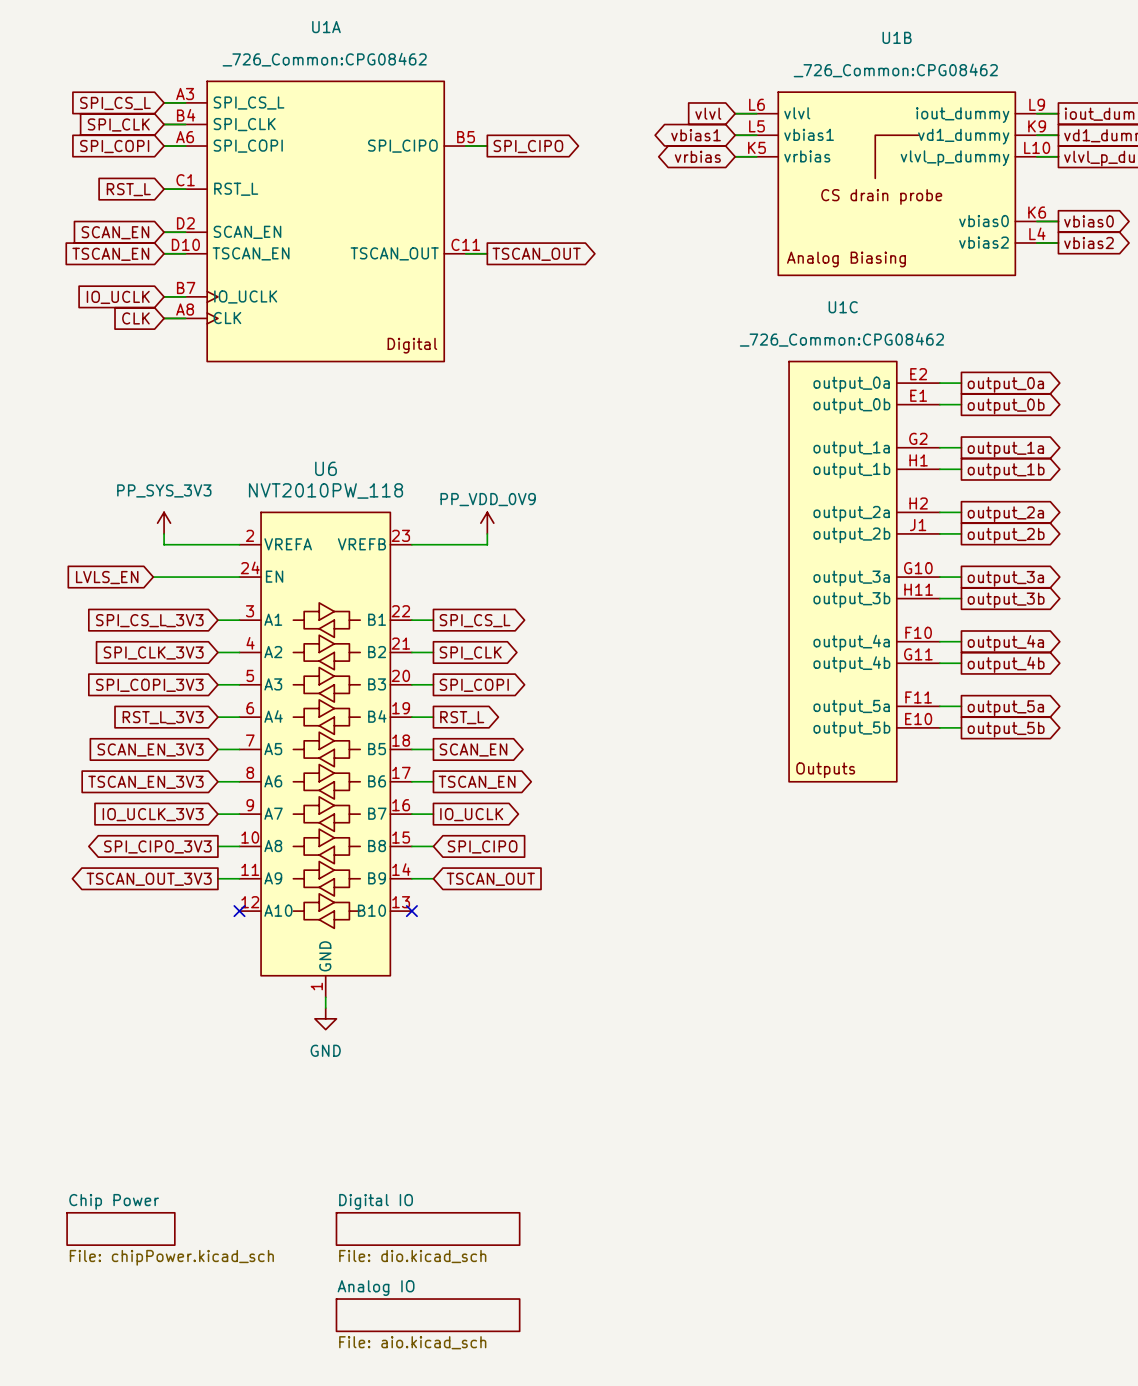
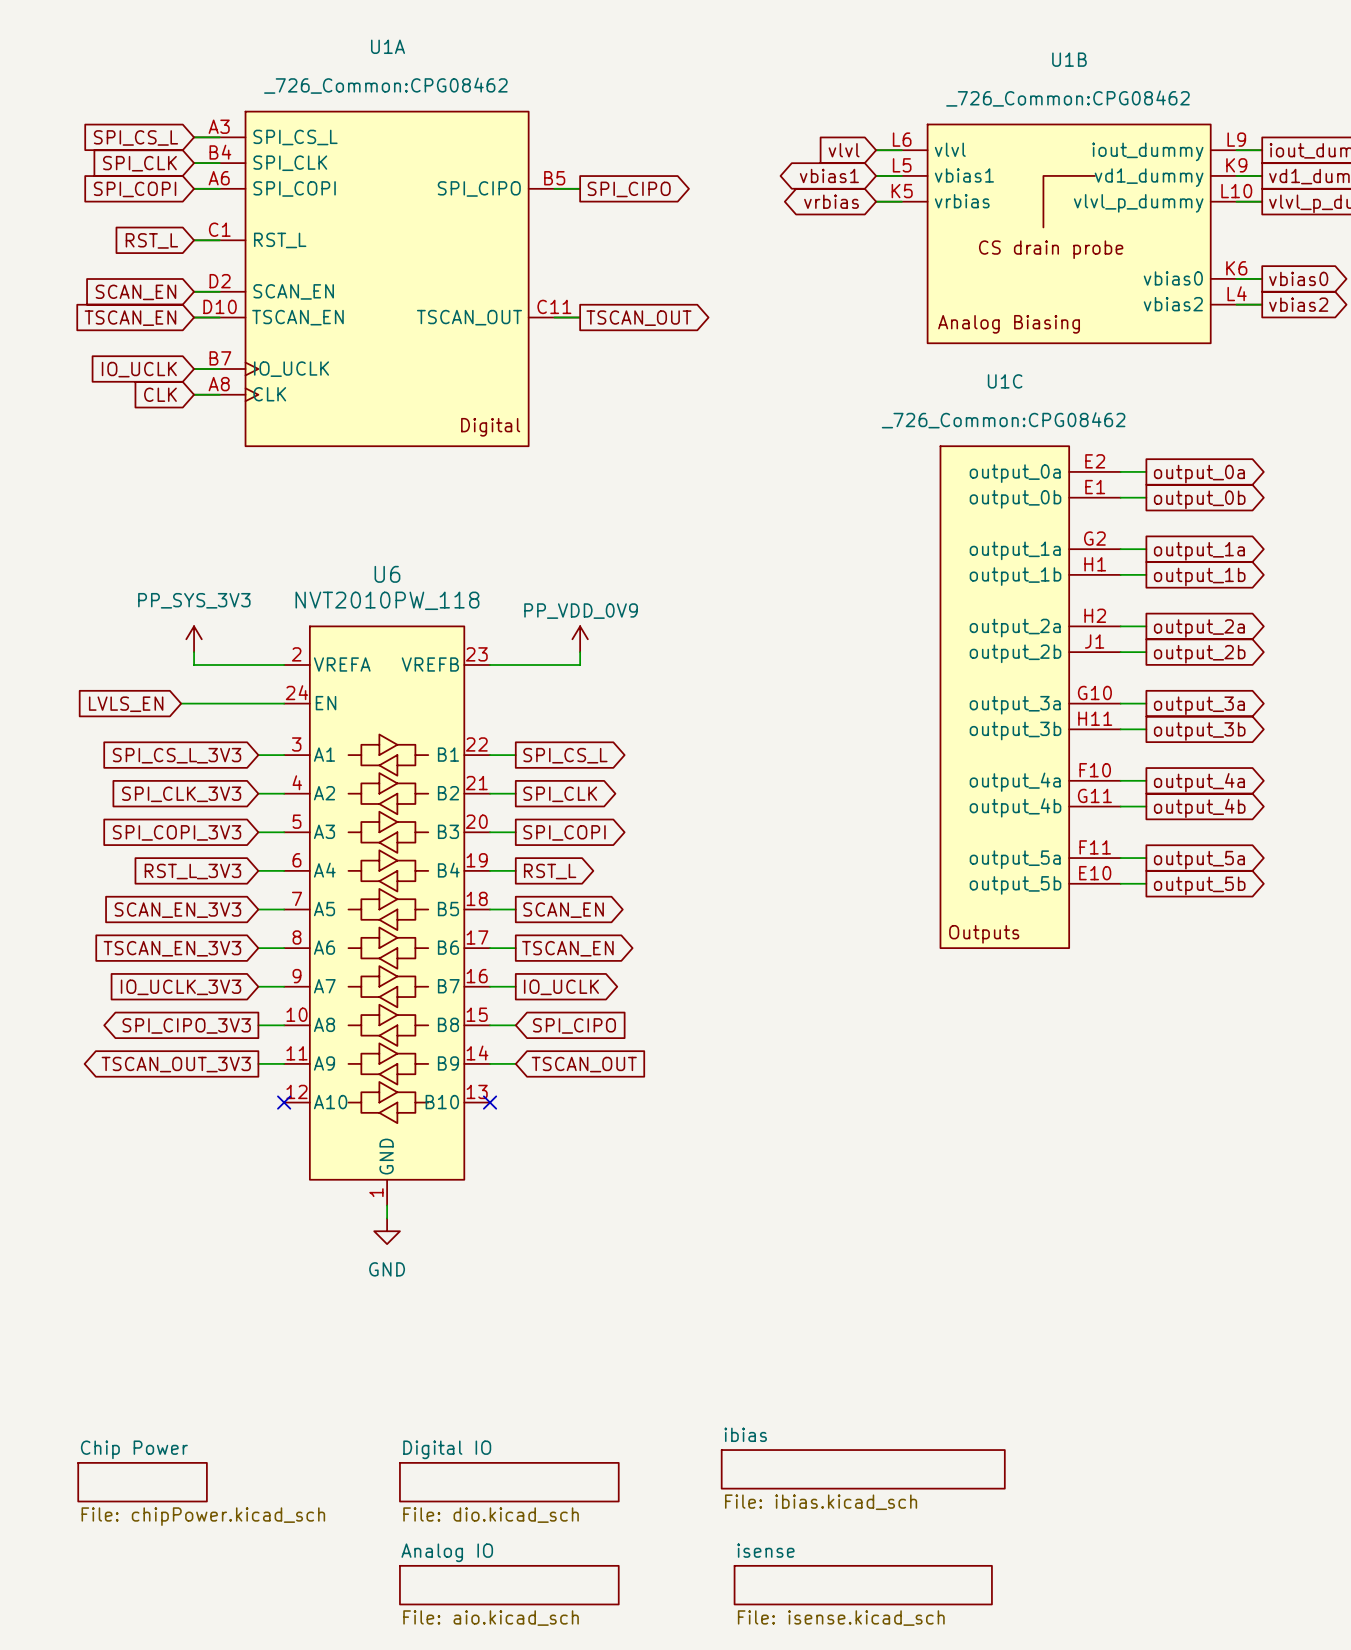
sheet ibias: none -> File: ibias.kicad_sch (863, 1469)
sheet isense: none -> File: isense.kicad_sch (863, 1585)

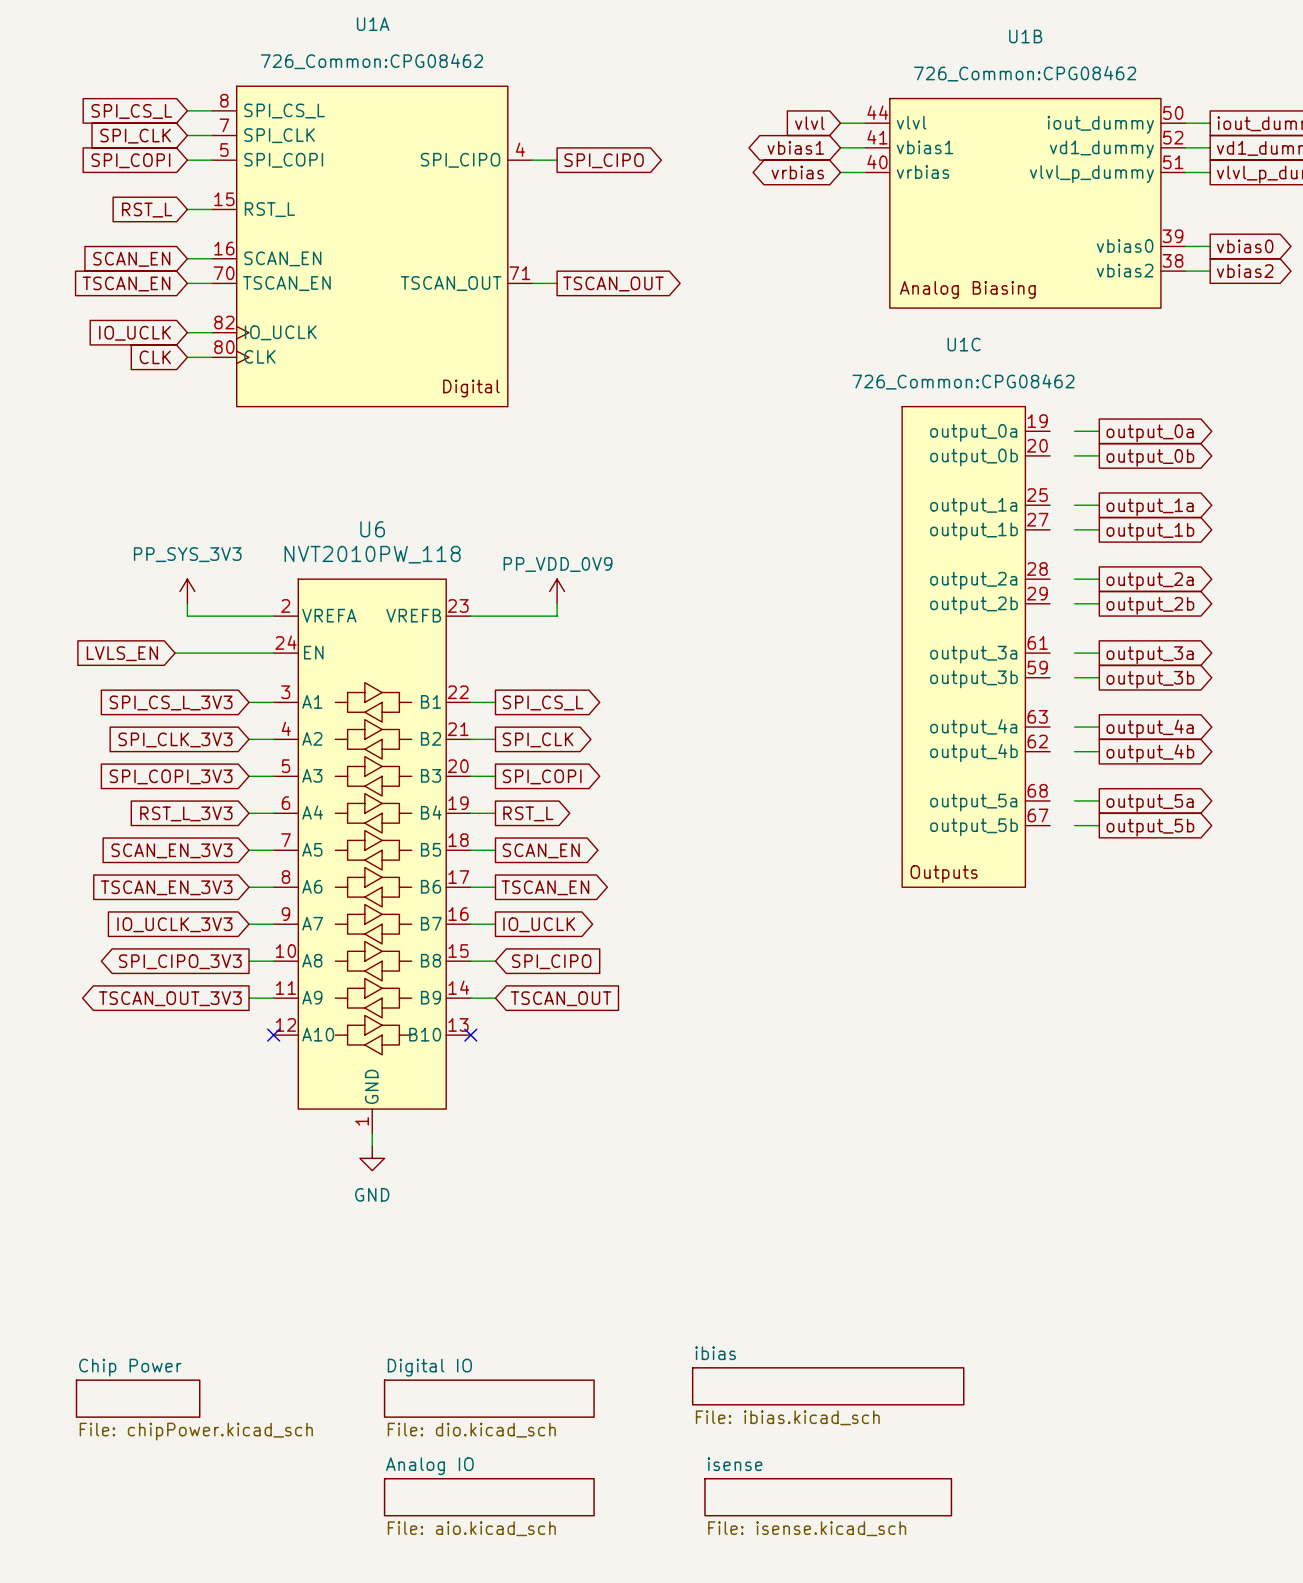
U1A text: _726_Common:CPG08462 (385, 85) -> 726_Common:CPG08462 (371, 61)
U1B text: _726_Common:CPG08462 (1067, 98) -> 726_Common:CPG08462 (1025, 73)
U1A symbol: [194, 111, 581, 447] -> [212, 86, 533, 407]
U1B symbol: [876, 124, 1263, 344] -> [865, 98, 1186, 309]
U1C text: _726_Common:CPG08462 (1003, 420) -> 726_Common:CPG08462 (963, 381)
U1C symbol: [940, 446, 1121, 949] -> [902, 406, 1051, 888]

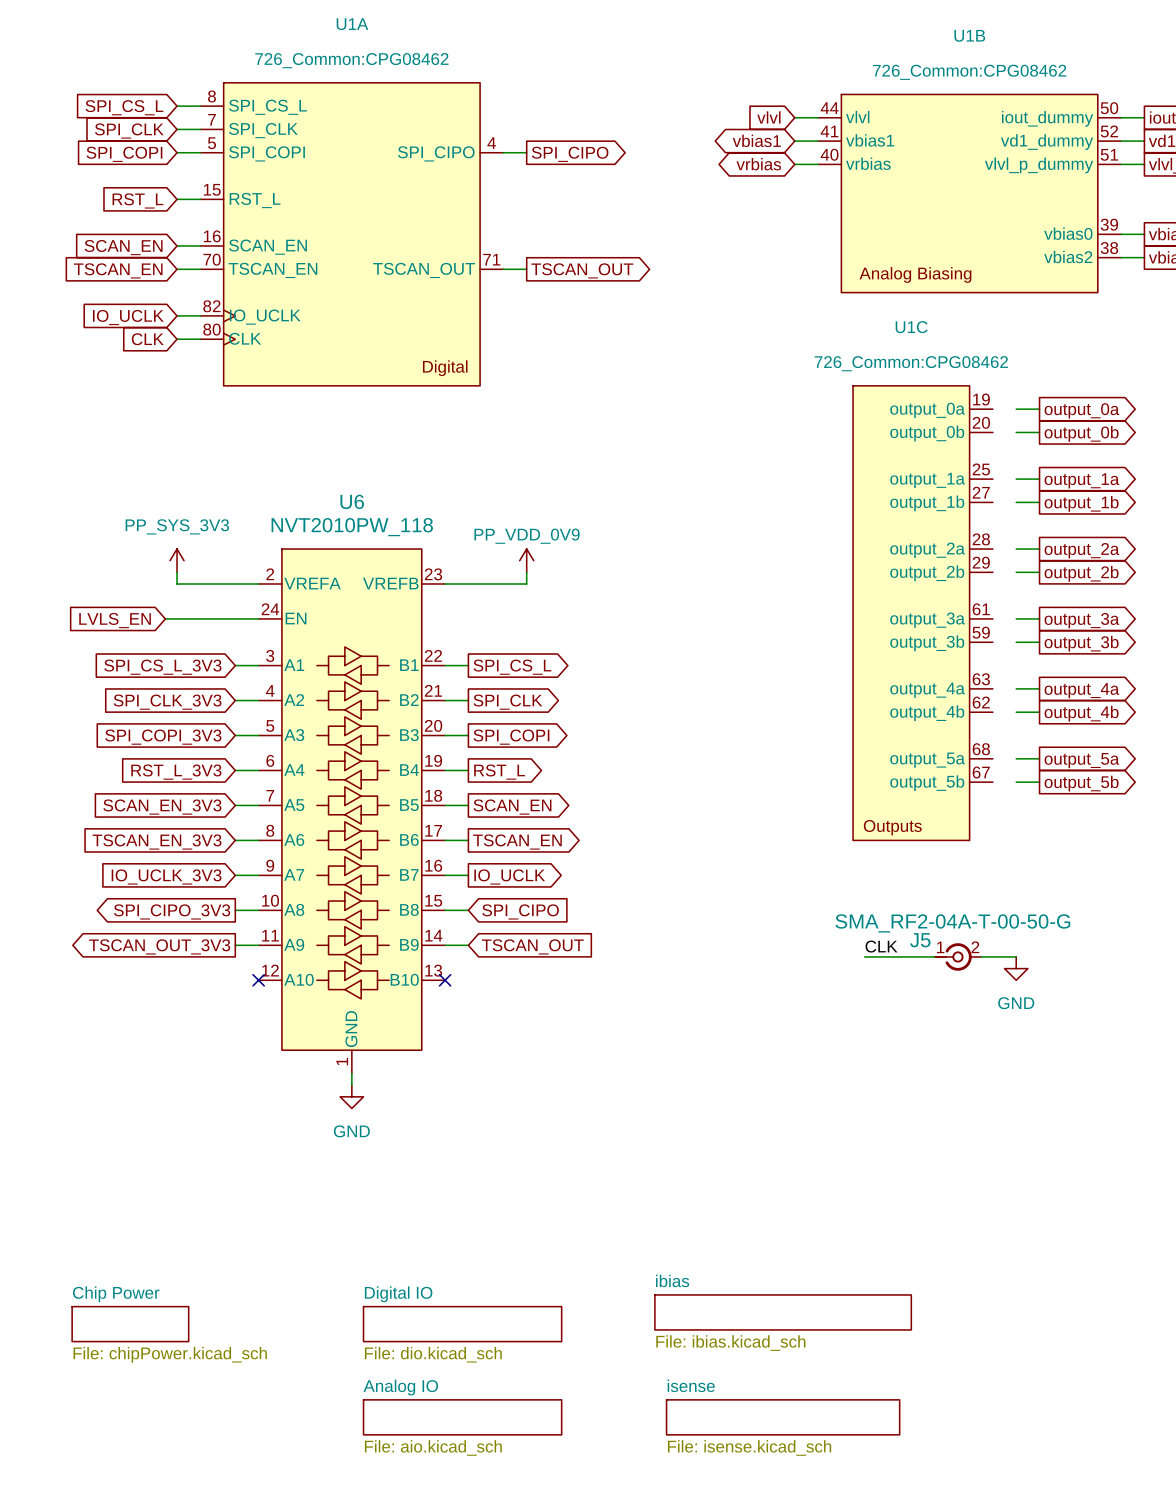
label: none -> CLK (881, 946)
wire: none -> (864, 956) (934, 956)
J5: none -> SMA_RF2-04A-T-00-50-G (957, 956)
wire: none -> (981, 956) (1016, 956)
power symbol: none -> GND (1016, 968)

